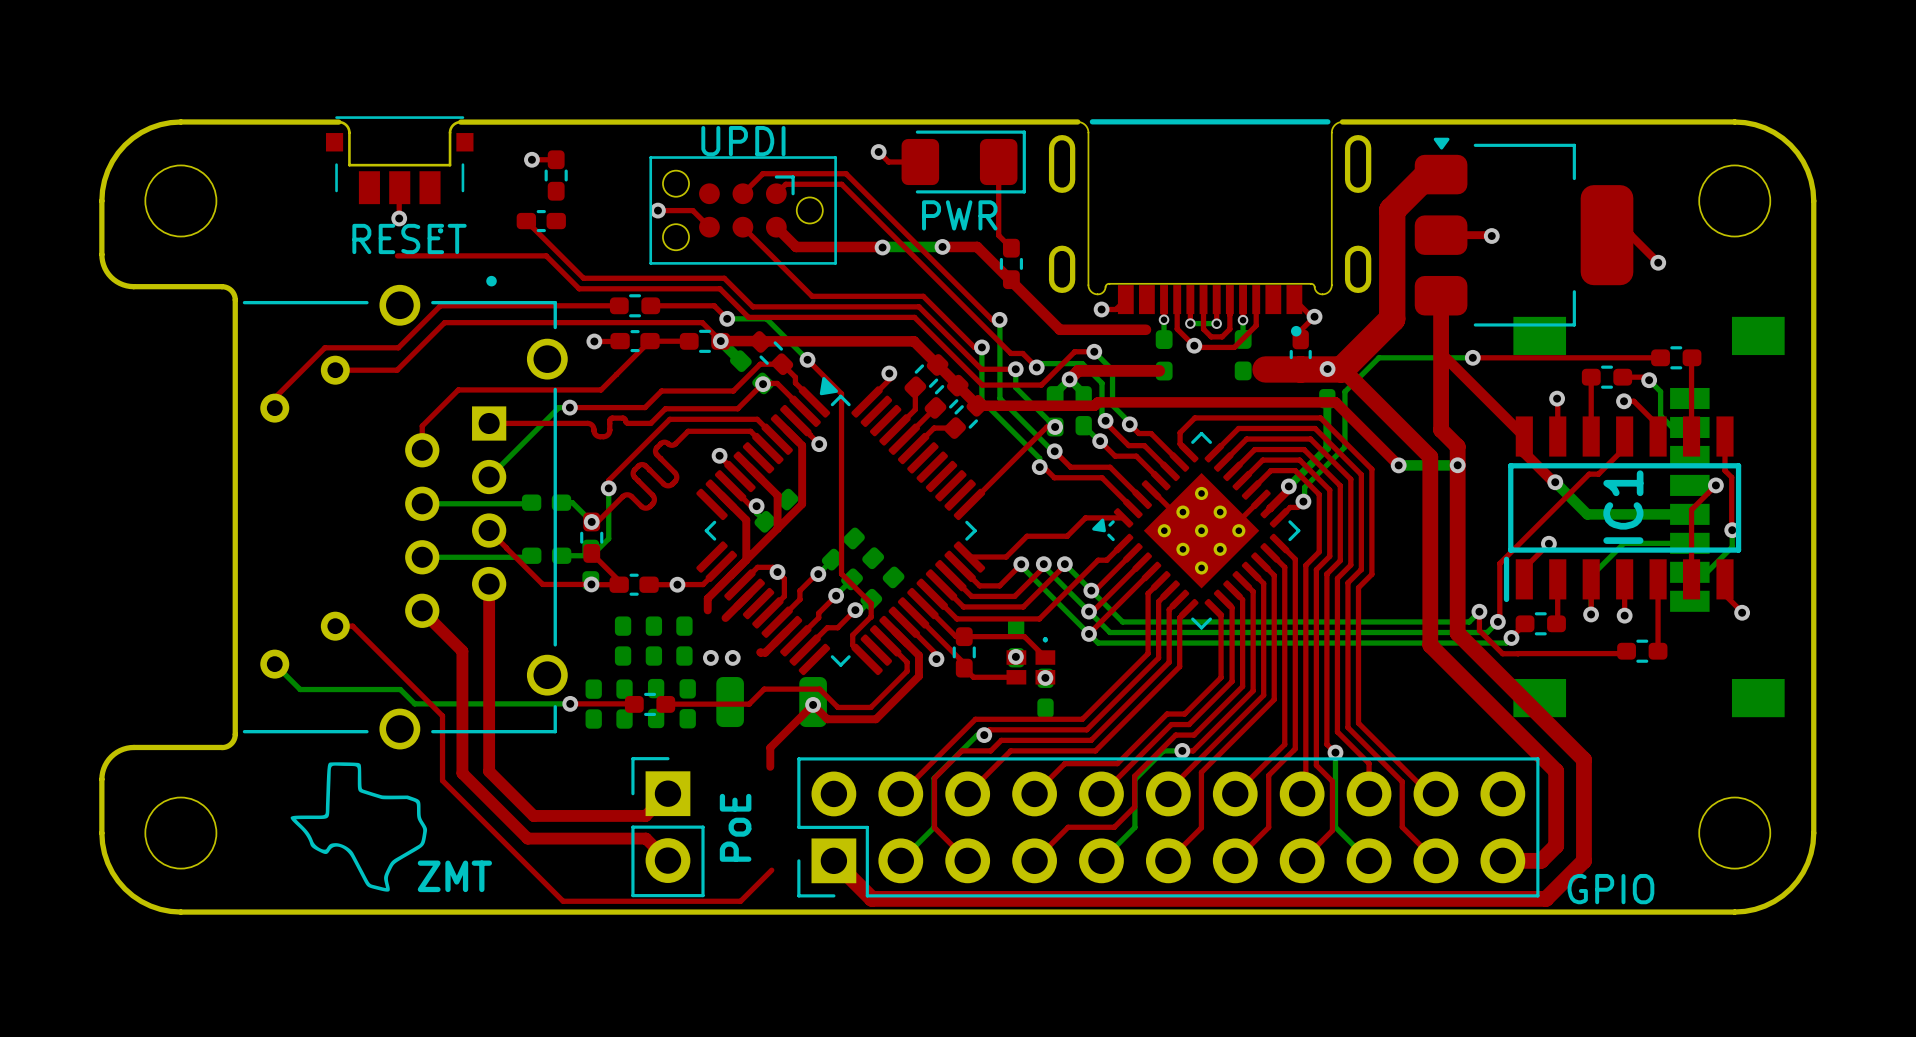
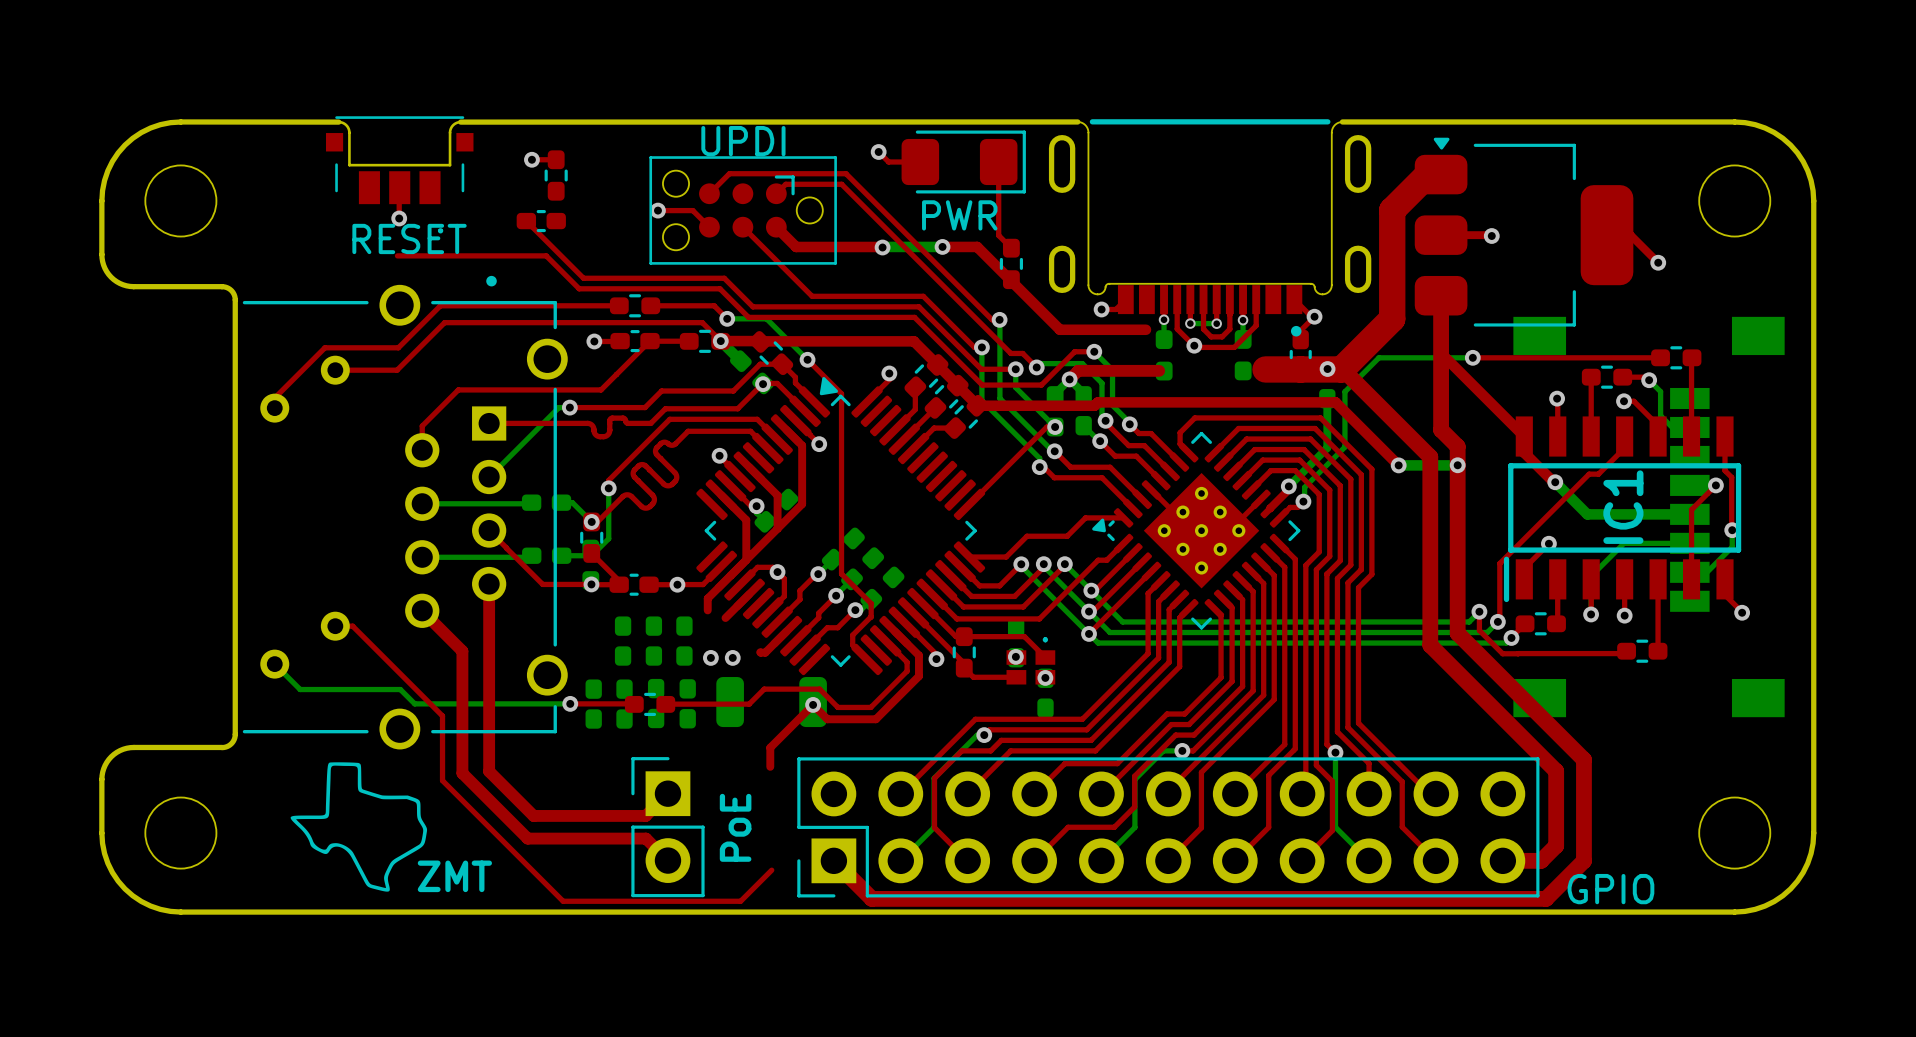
top track: (762, 173) (742, 193) -> (762, 173) (729, 173) (709, 193)

